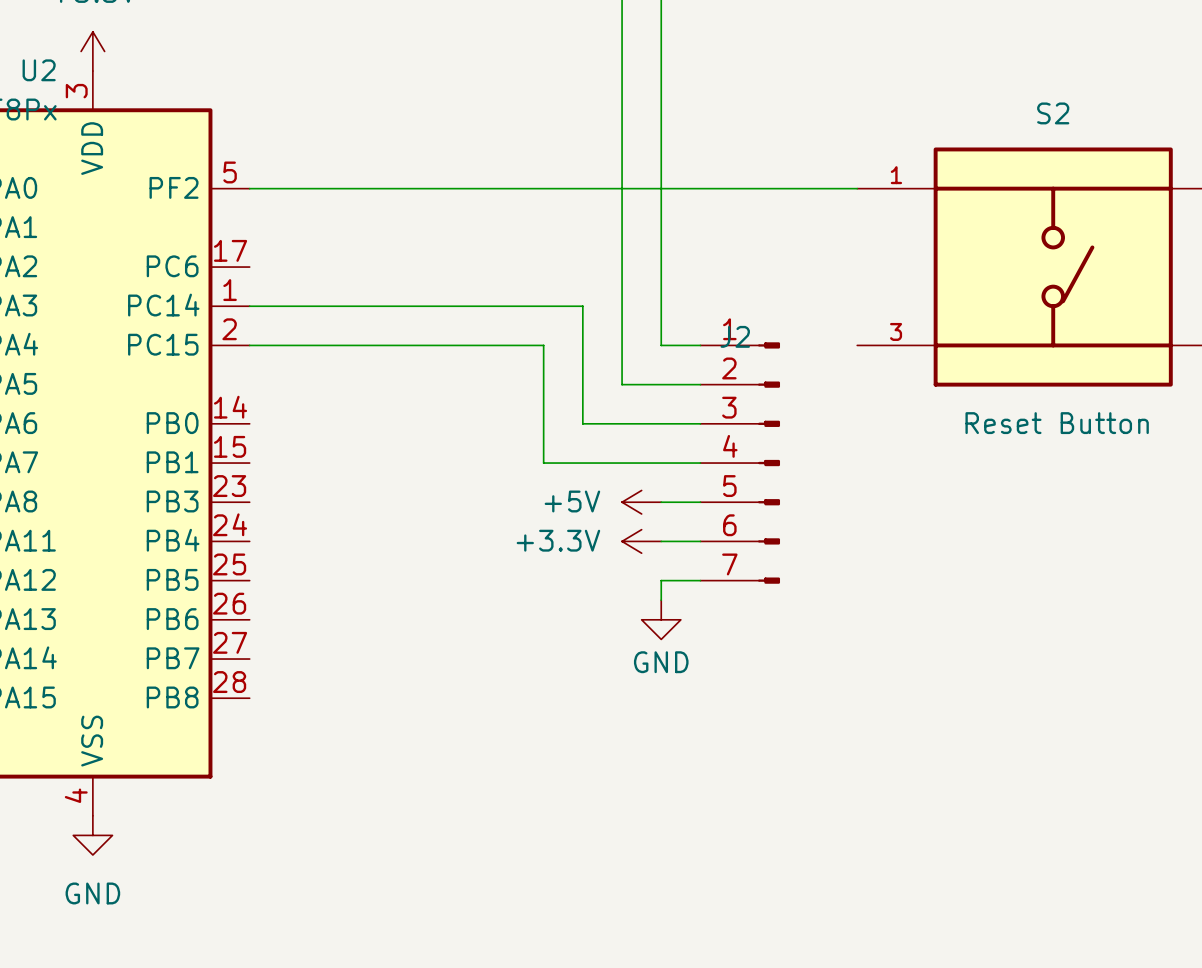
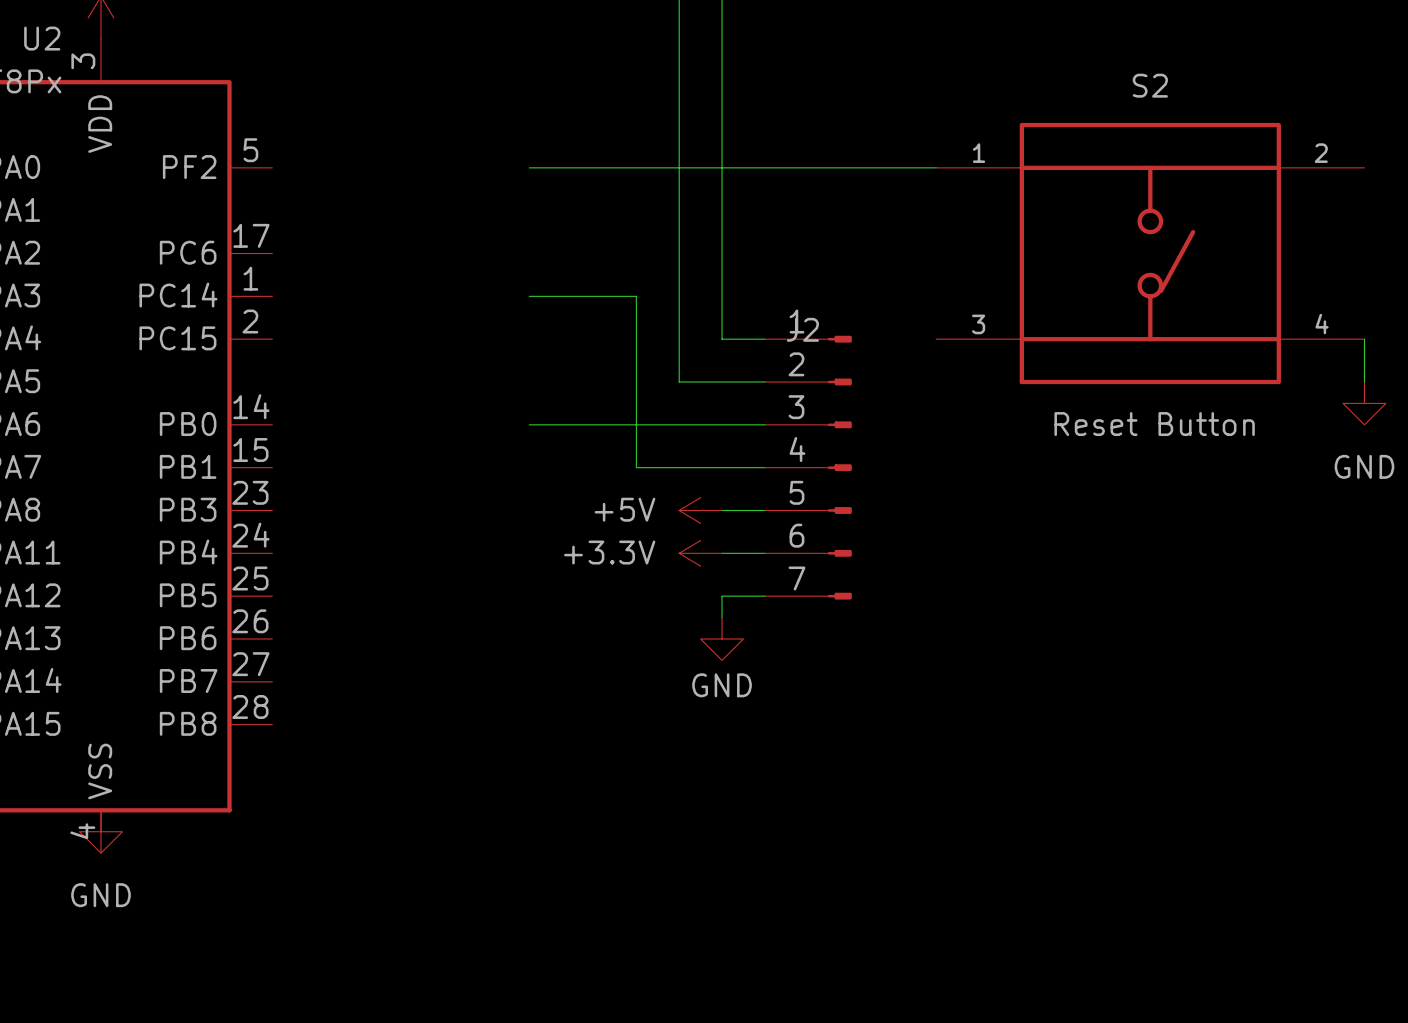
wire: (249, 188) (484, 188) -> none
wire: (249, 306) (484, 306) -> none
wire: (249, 345) (543, 345) (543, 463) (582, 463) -> (529, 424) (636, 424) (636, 467)
power symbol position: GND (92, 835) -> GND (101, 831)

